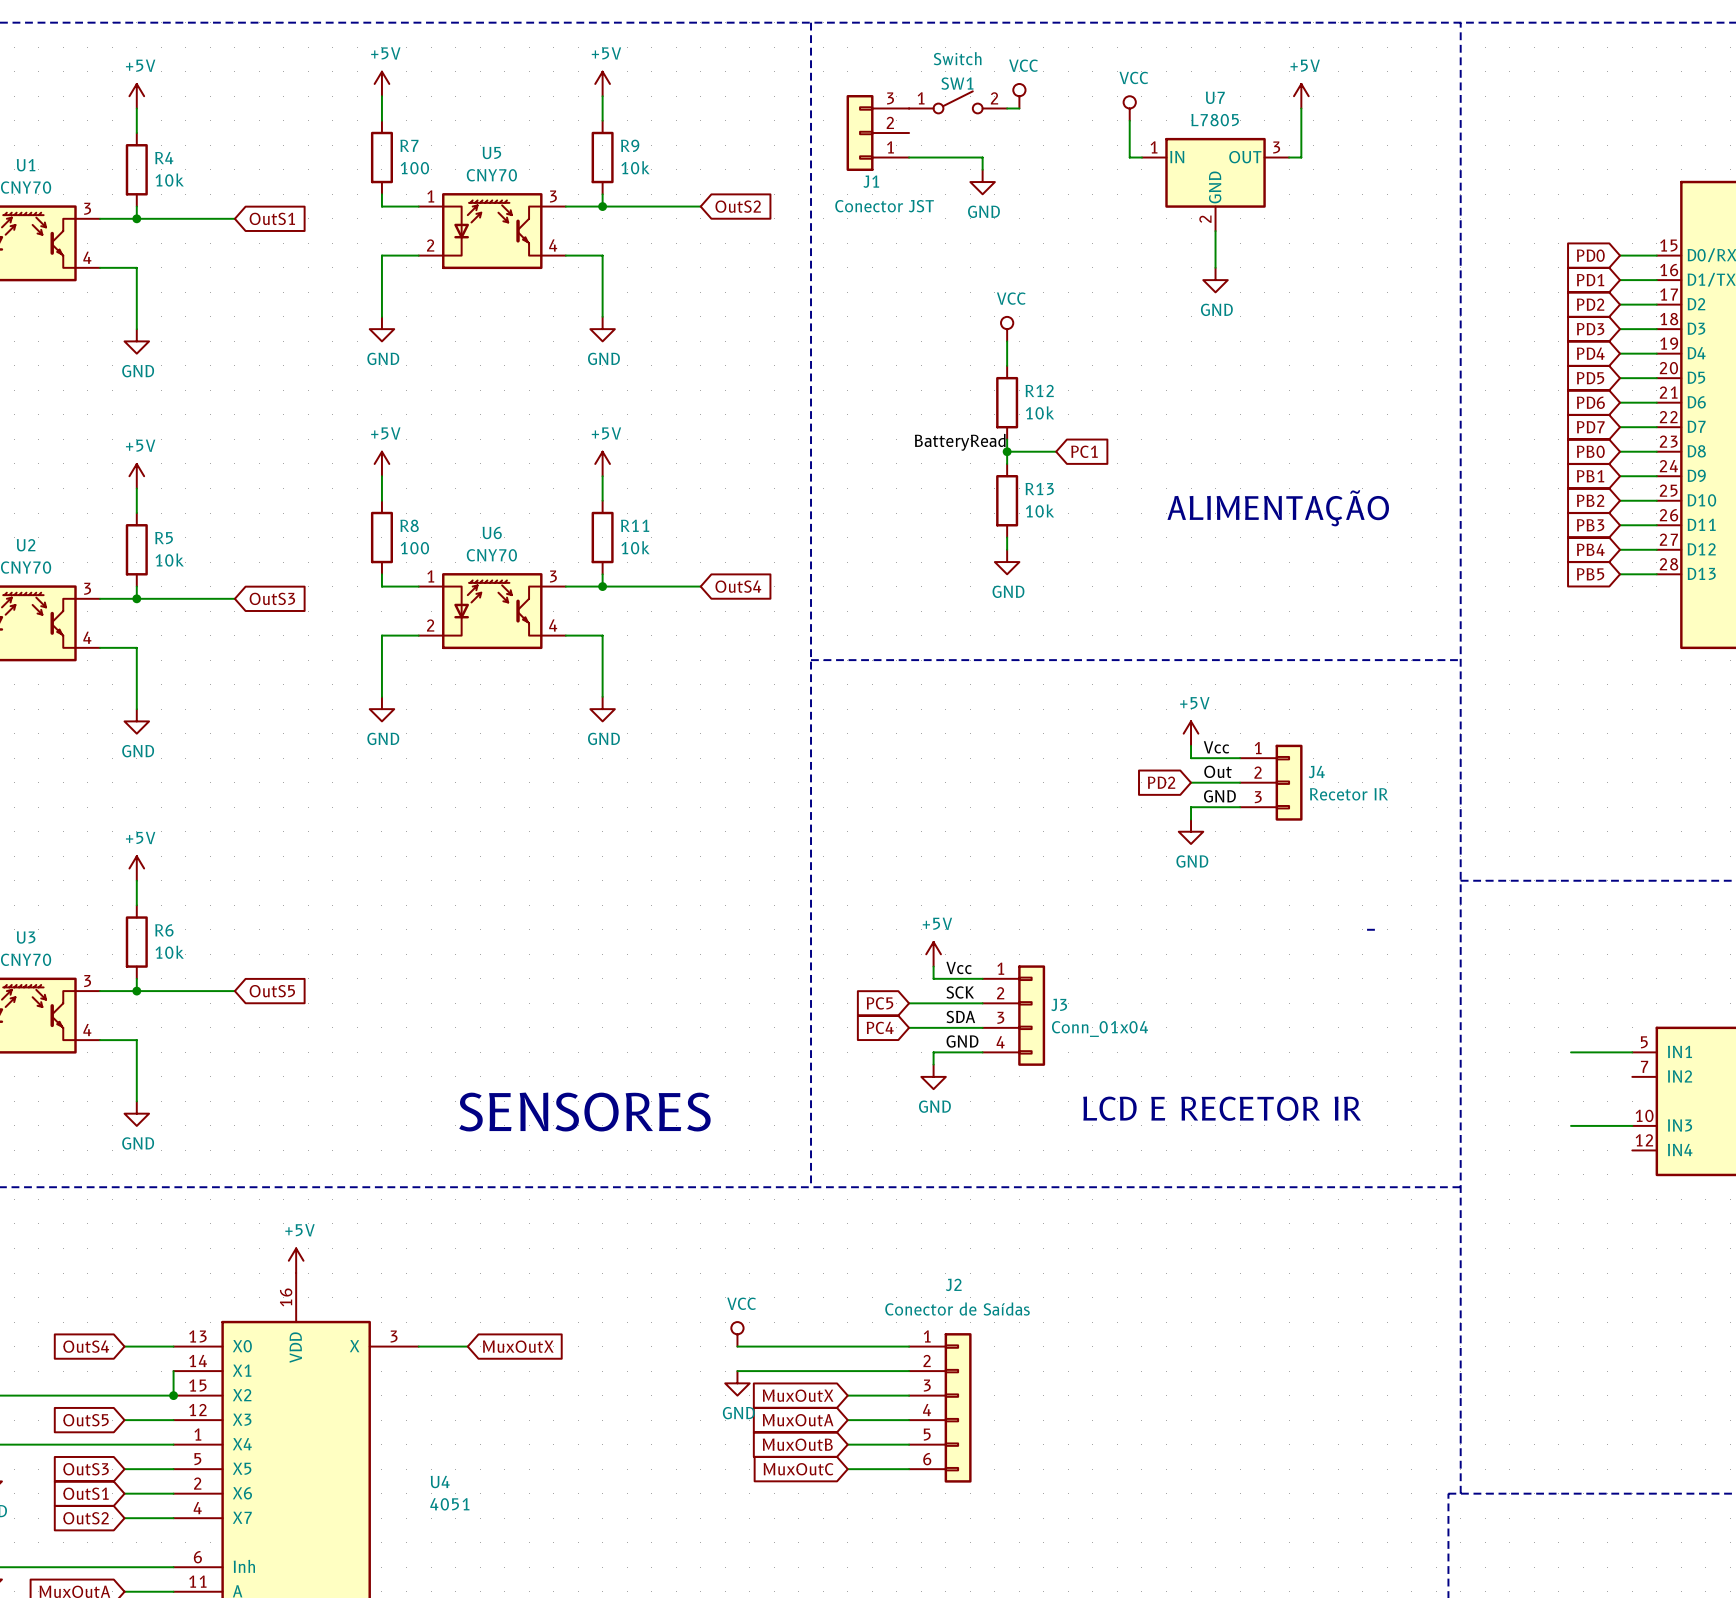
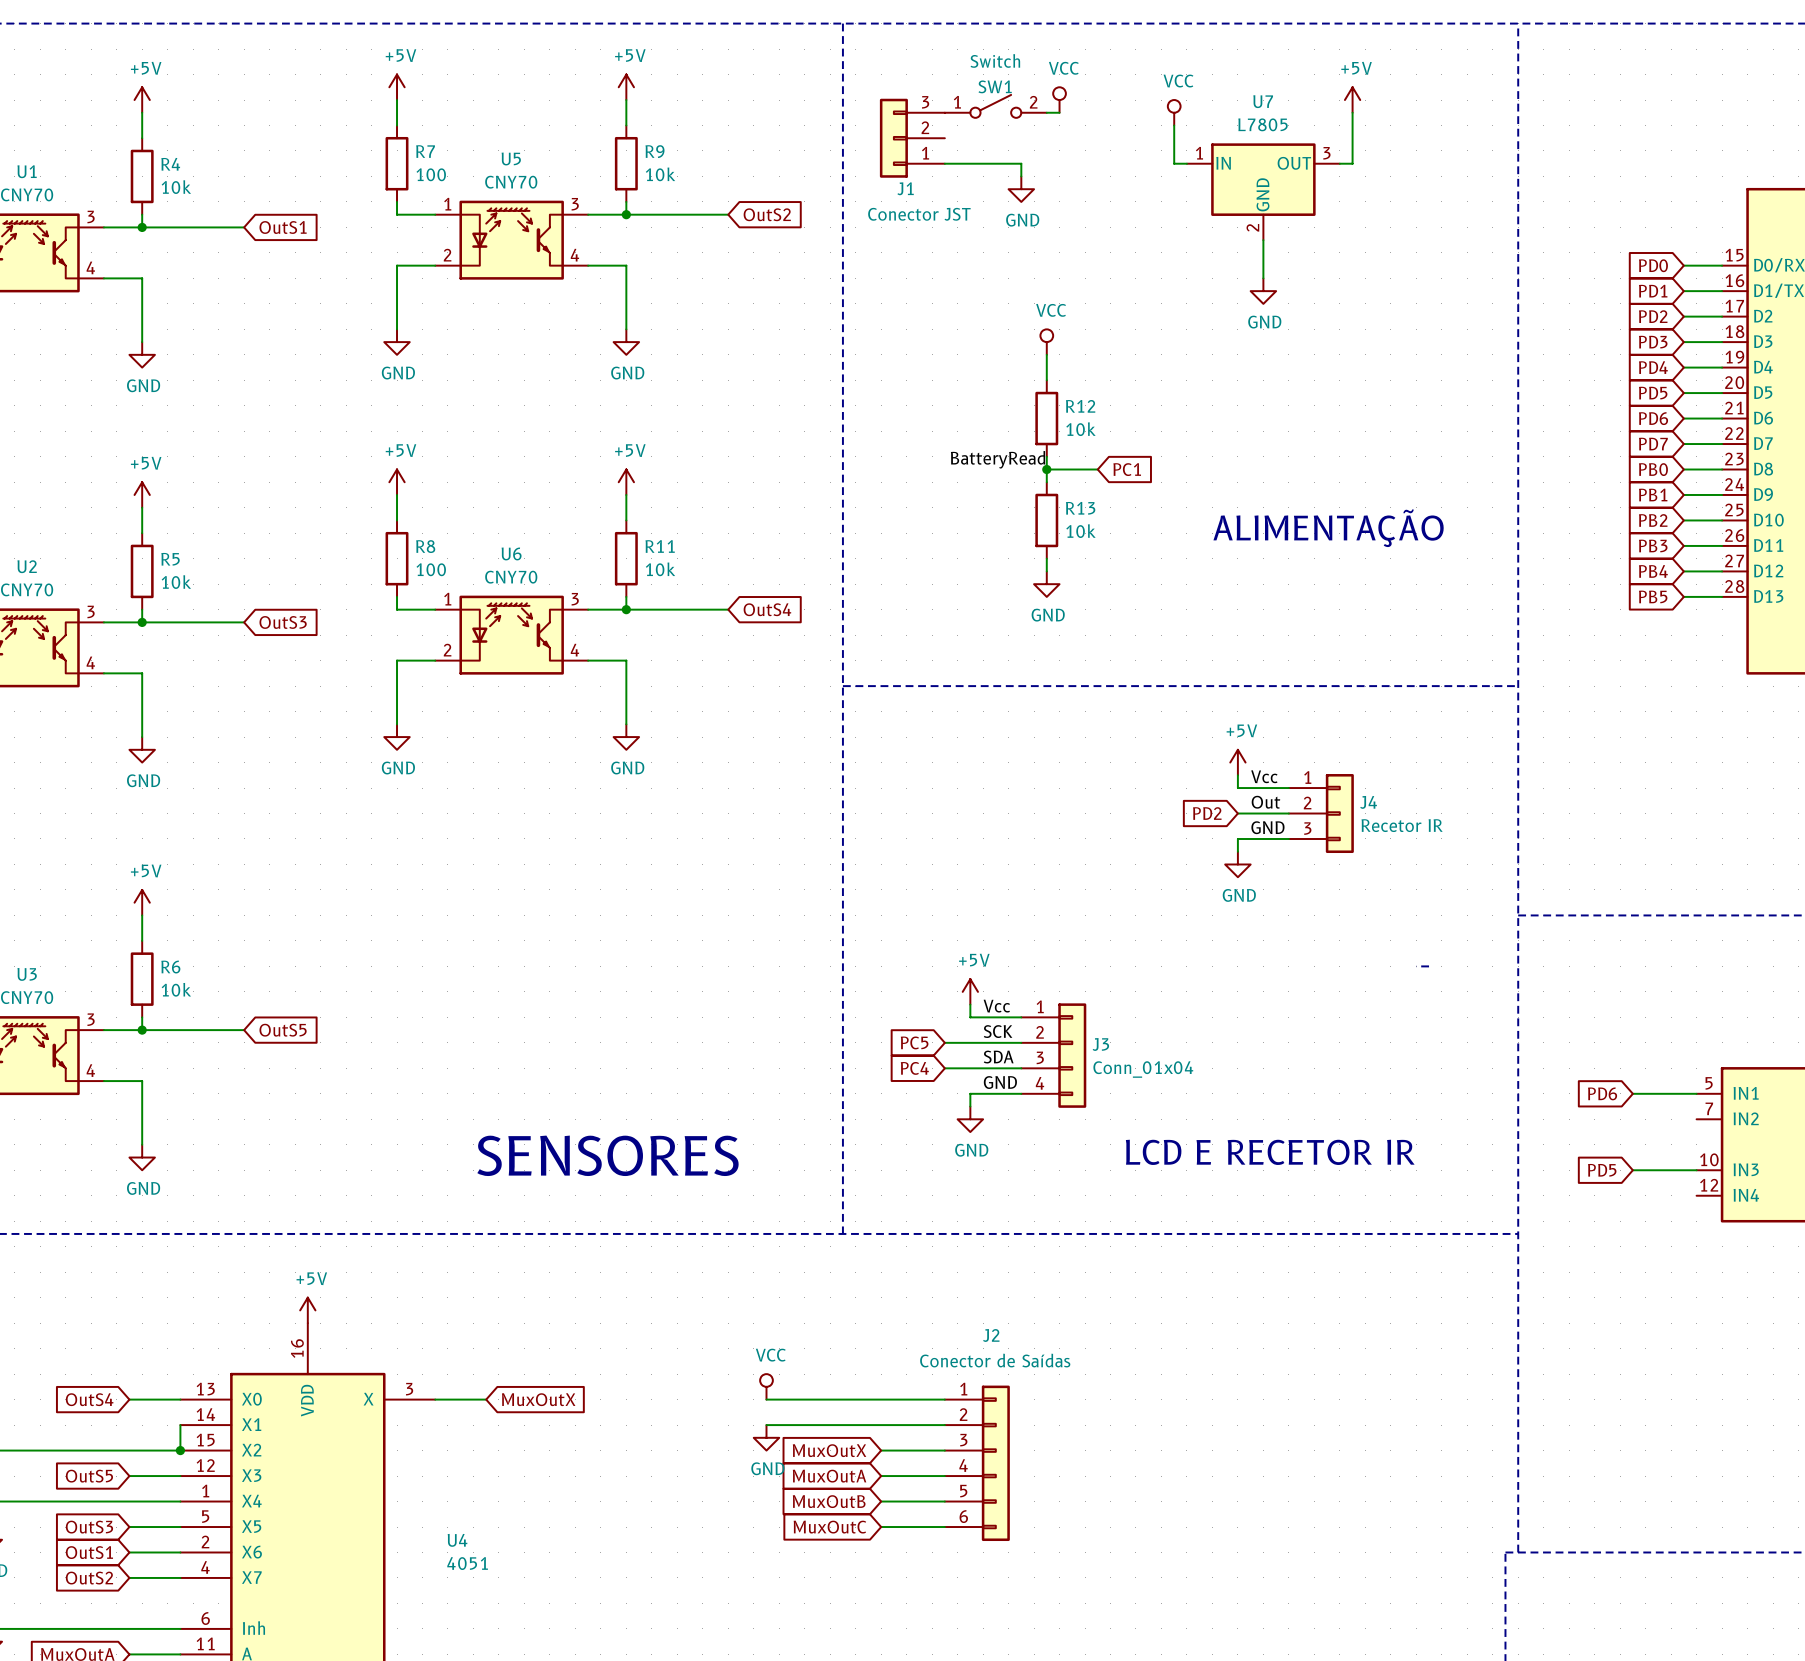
global label: none -> PD6 (1602, 1093)
global label: none -> PD5 (1602, 1170)

